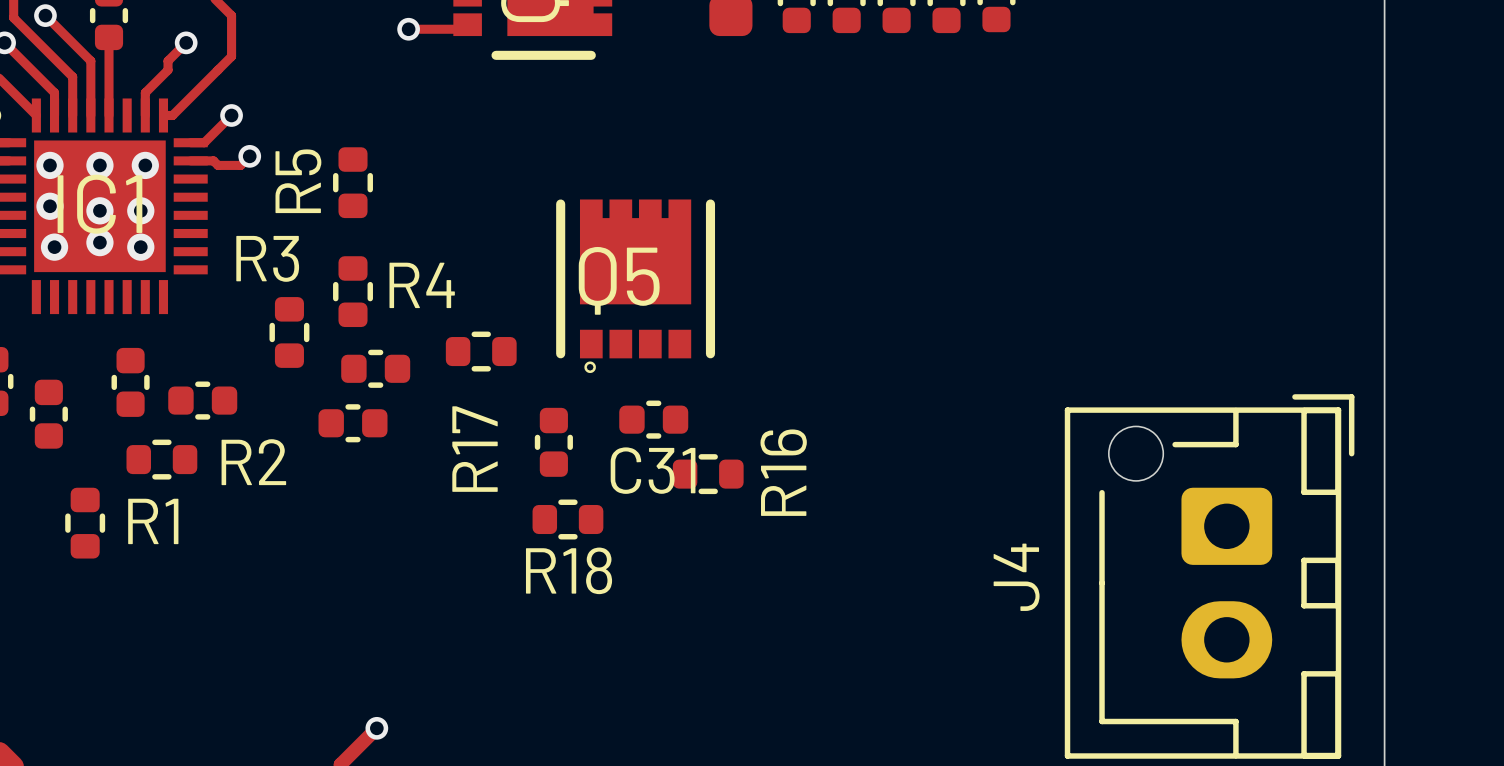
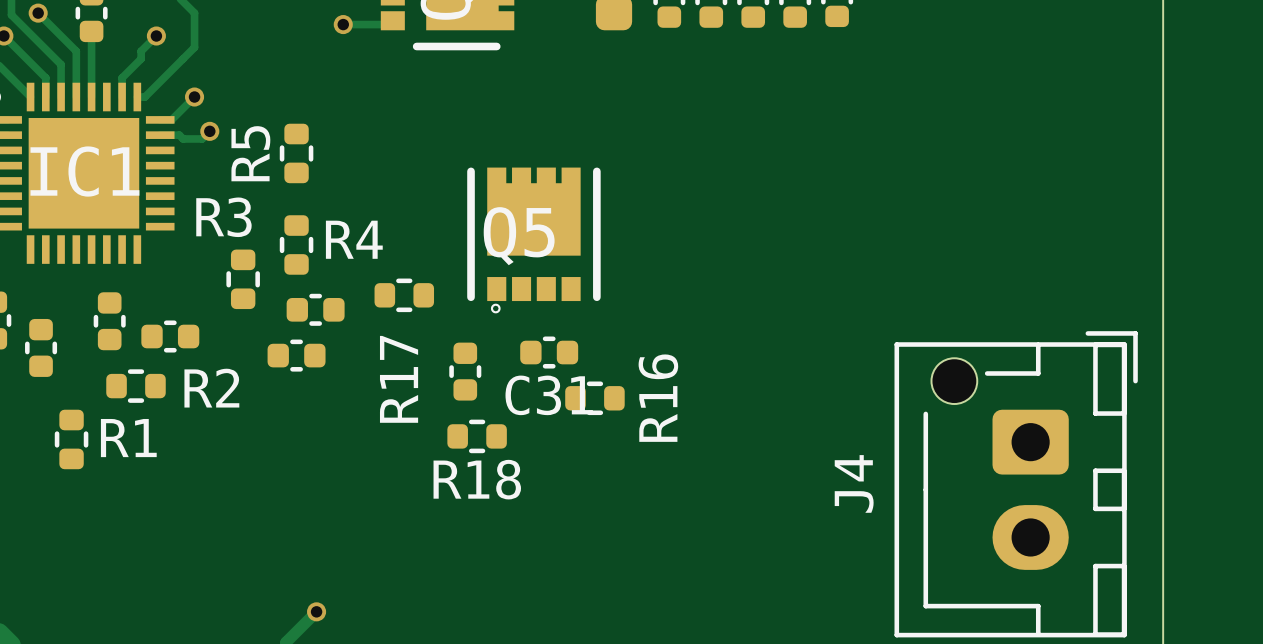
via: (49, 165) -> none
via: (99, 165) -> none
via: (145, 165) -> none
via: (49, 206) -> none
via: (99, 210) -> none
via: (140, 210) -> none
via: (99, 242) -> none
via: (54, 247) -> none
via: (140, 247) -> none

